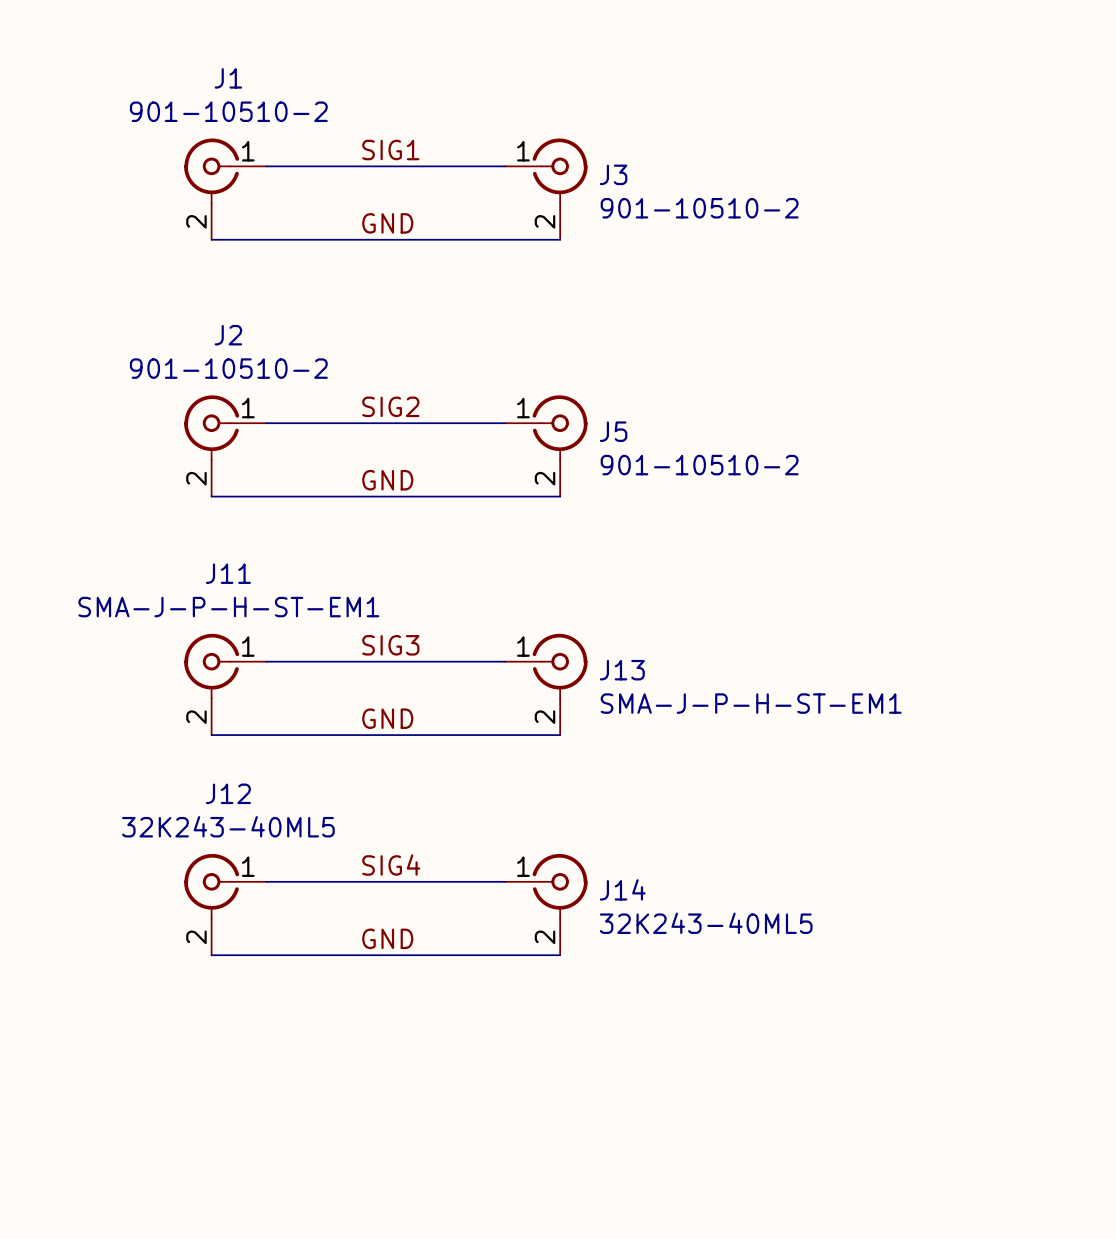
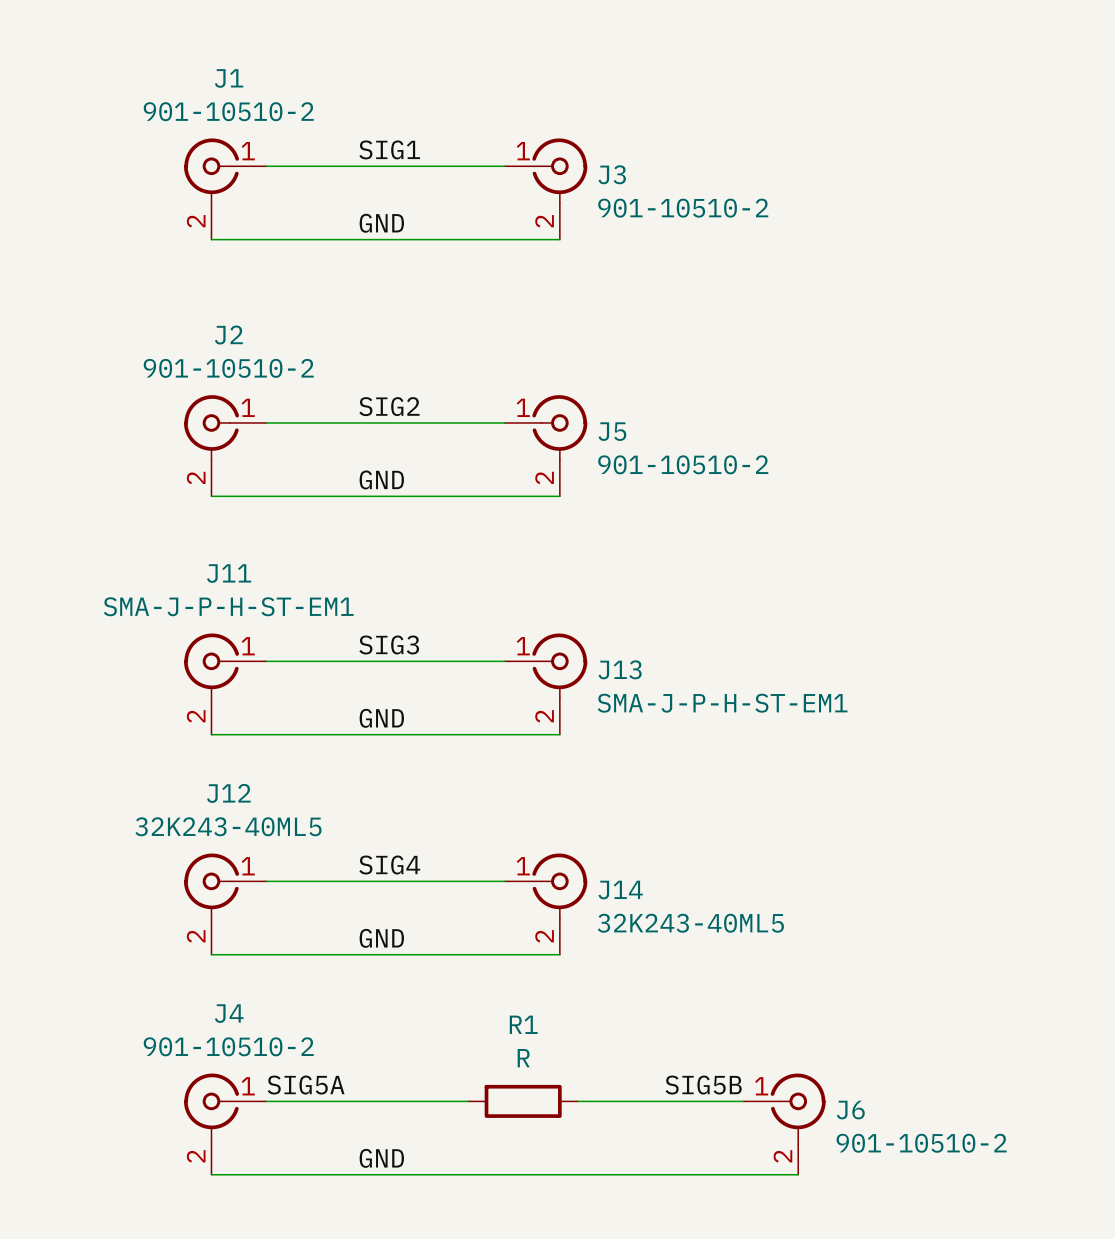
label: none -> SIG5A (306, 1085)
label: none -> SIG5B (703, 1085)
wire: none -> (266, 1101) (468, 1101)
R1: none -> R (523, 1101)
wire: none -> (578, 1101) (743, 1101)
J4: none -> 901-10510-2 (225, 1124)
J6: none -> 901-10510-2 (784, 1124)
label: none -> GND (381, 1158)
wire: none -> (211, 1174) (798, 1174)

